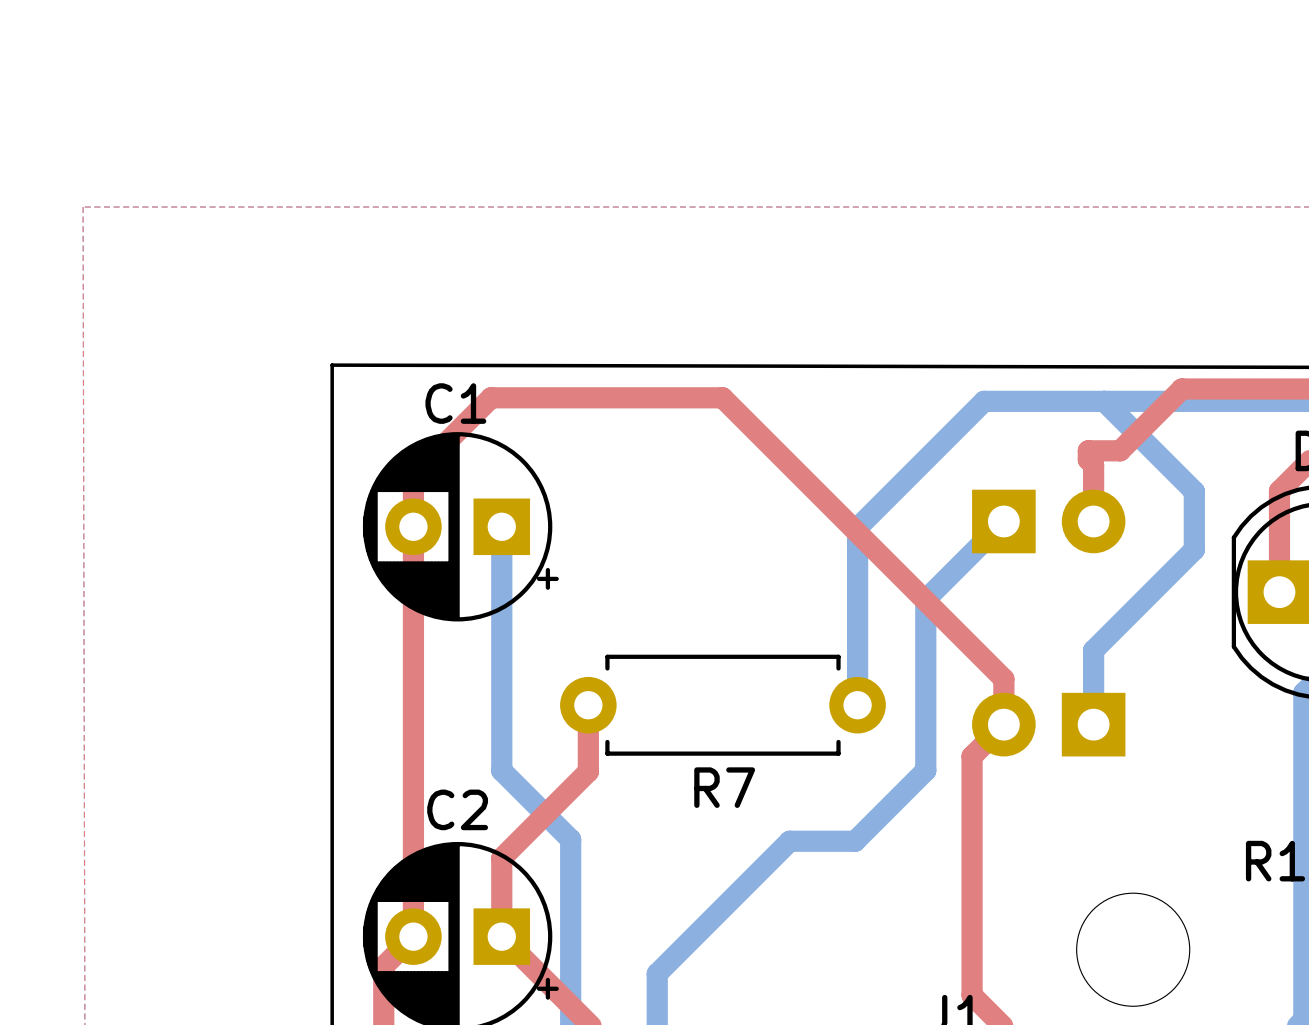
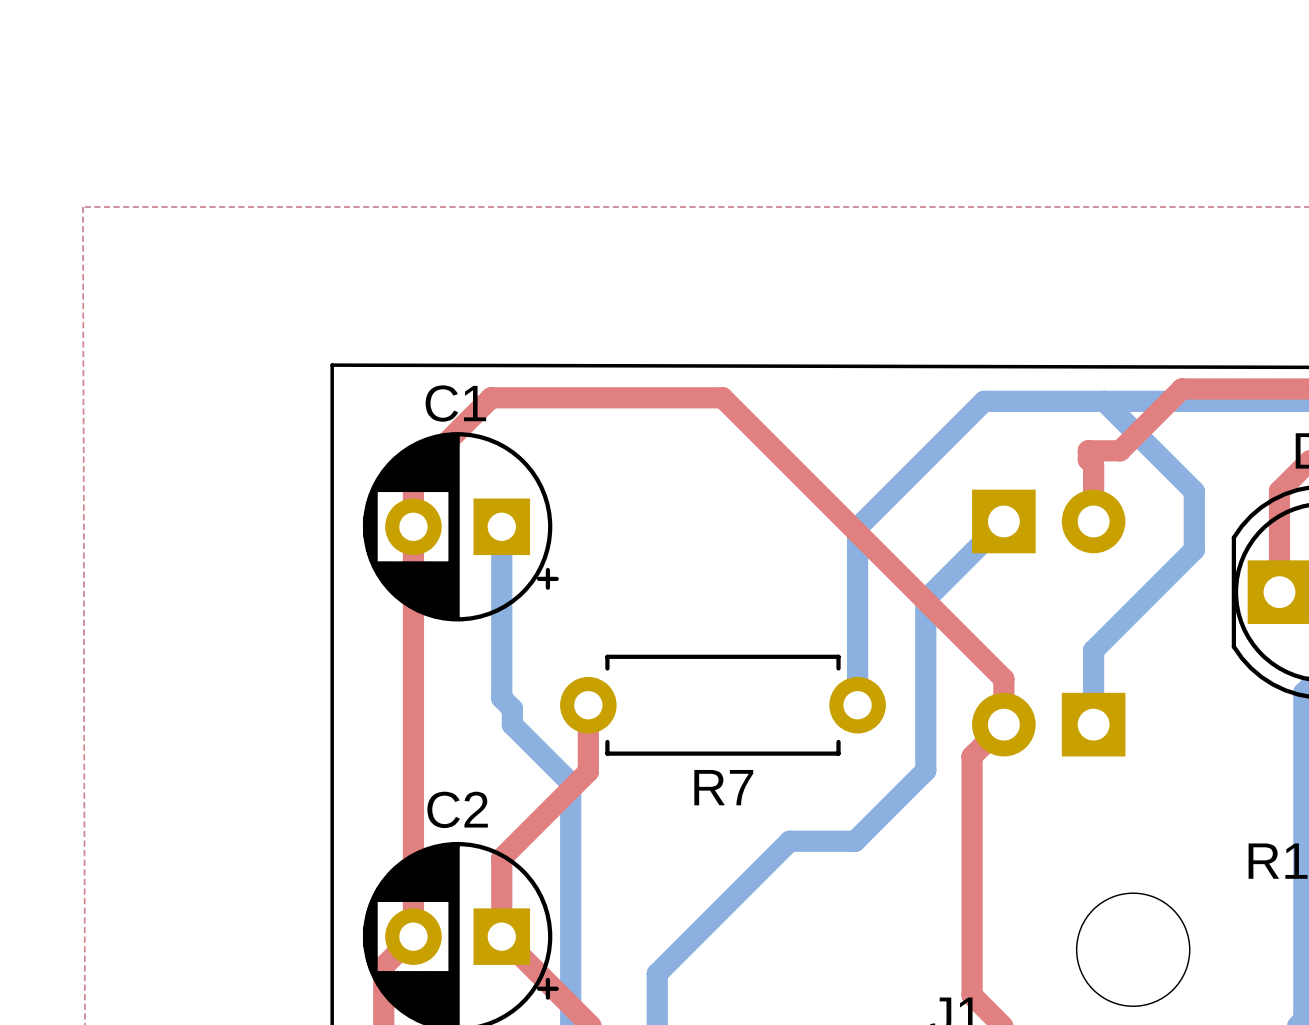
bottom track: (501, 698) (501, 770) (570, 839) -> (501, 698) (512, 708) (512, 724) (570, 782) (570, 839)

